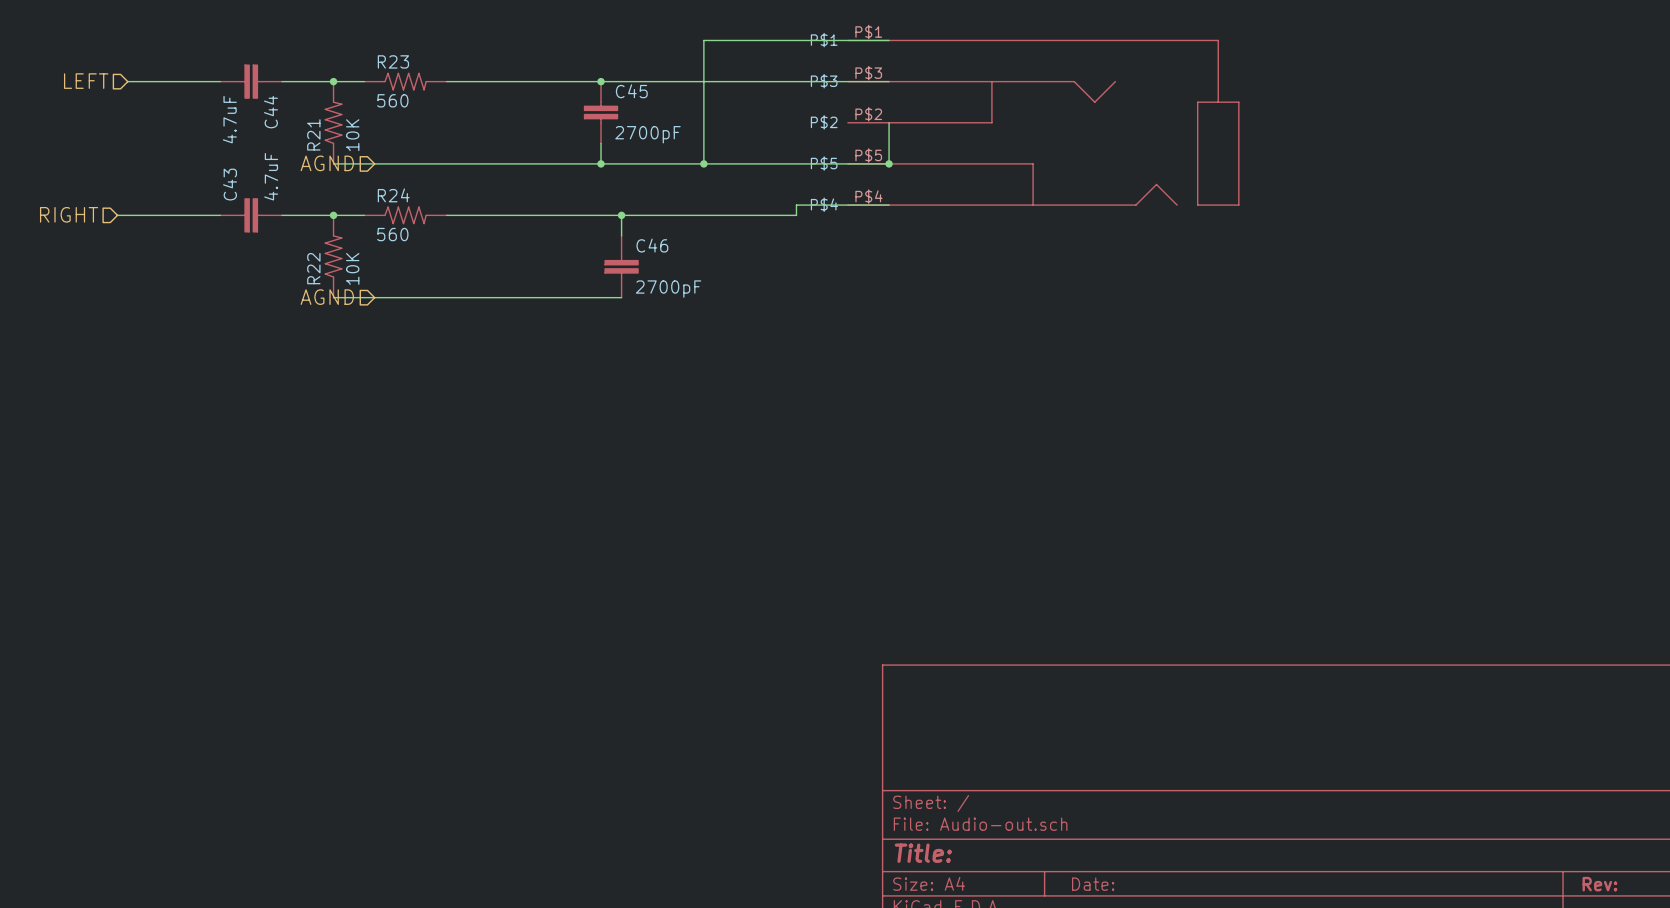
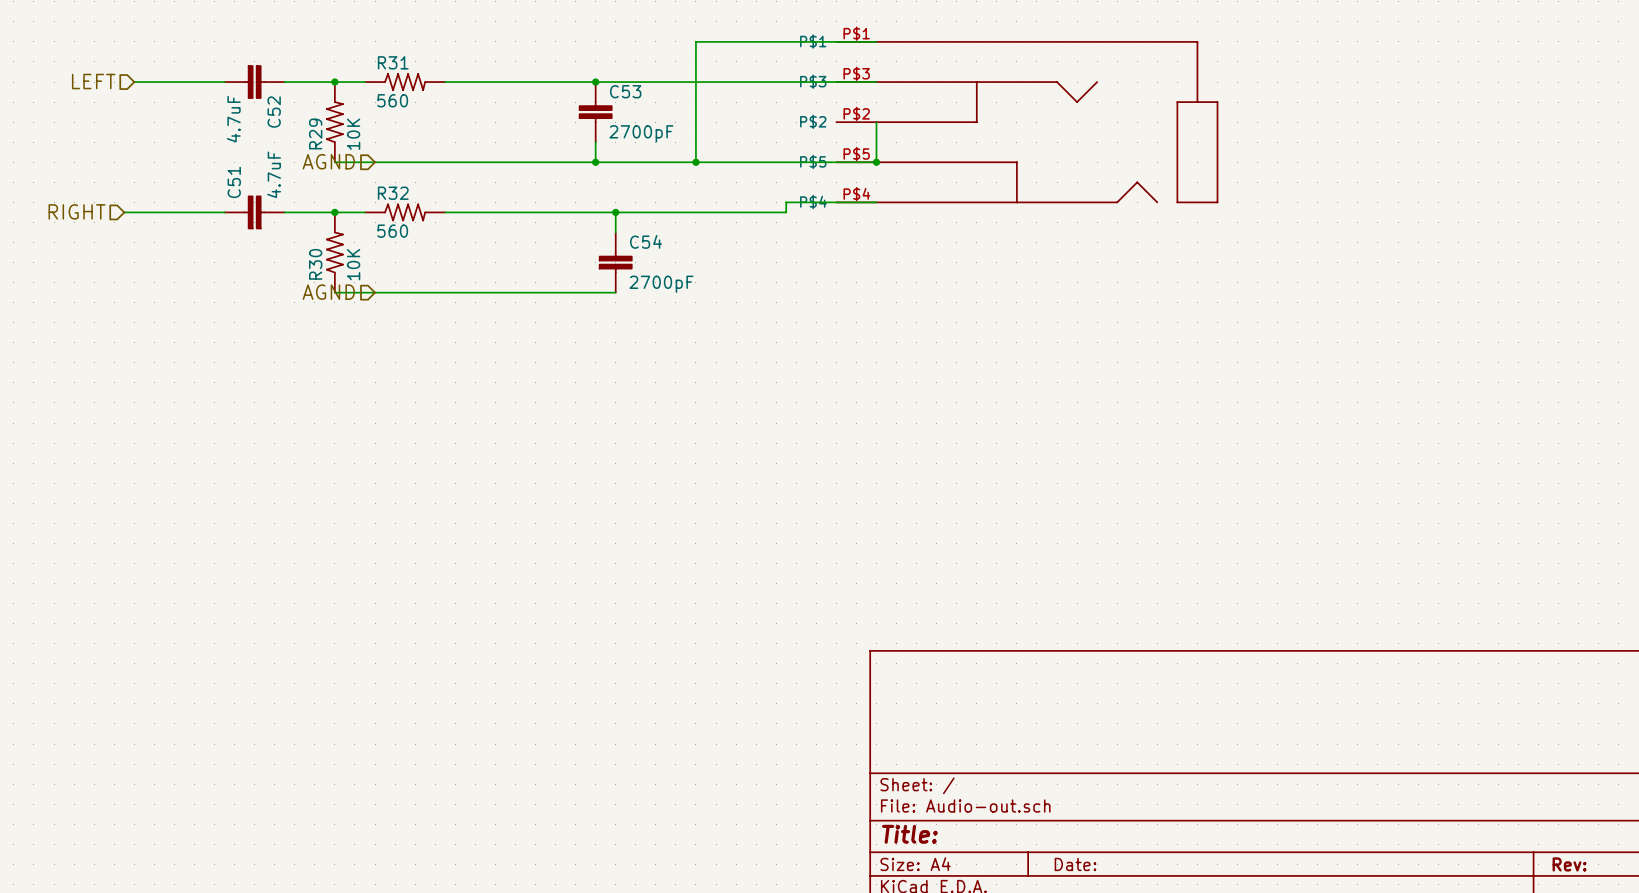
R23 name: R23 (393, 61) -> R31 (393, 62)
C45 name: C45 (631, 91) -> C53 (625, 91)
C44 name: C44 (270, 112) -> C52 (274, 112)
R21 name: R21 (313, 134) -> R29 (315, 133)
C43 name: C43 (230, 184) -> C51 (234, 182)
R24 name: R24 (393, 195) -> R32 (393, 193)
C46 name: C46 (652, 245) -> C54 (646, 241)
R22 name: R22 (313, 268) -> R30 (315, 264)

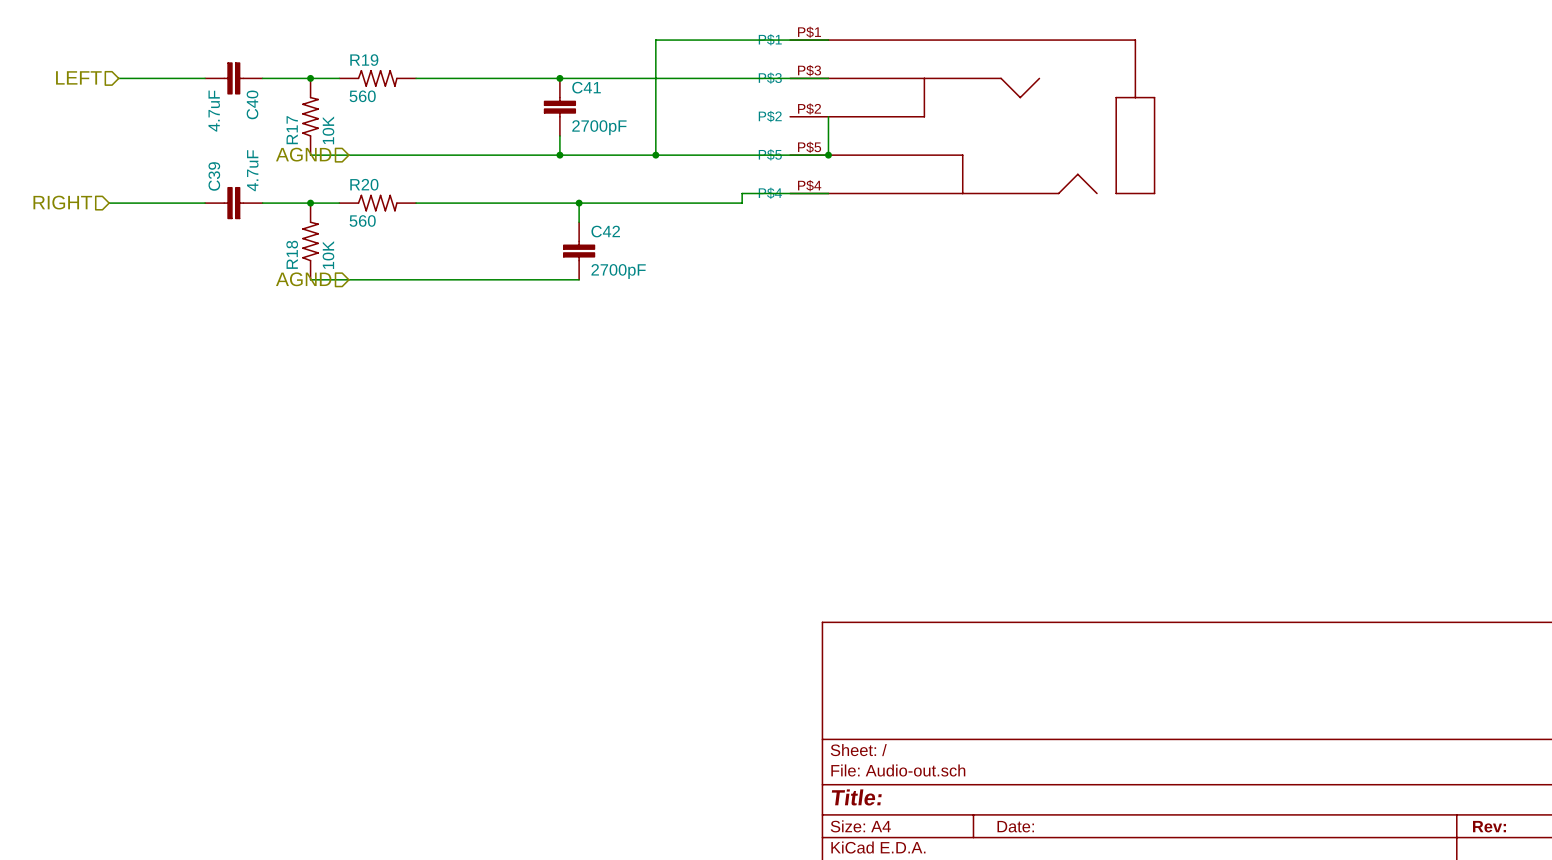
R31 name: R31 (393, 62) -> R19 (364, 60)
C53 name: C53 (625, 91) -> C41 (586, 87)
C52 name: C52 (274, 112) -> C40 (252, 104)
R29 name: R29 (315, 133) -> R17 (292, 130)
C51 name: C51 (234, 182) -> C39 (214, 176)
R32 name: R32 (393, 193) -> R20 (364, 184)
C54 name: C54 (646, 241) -> C42 (605, 231)
R30 name: R30 (315, 264) -> R18 (292, 254)

